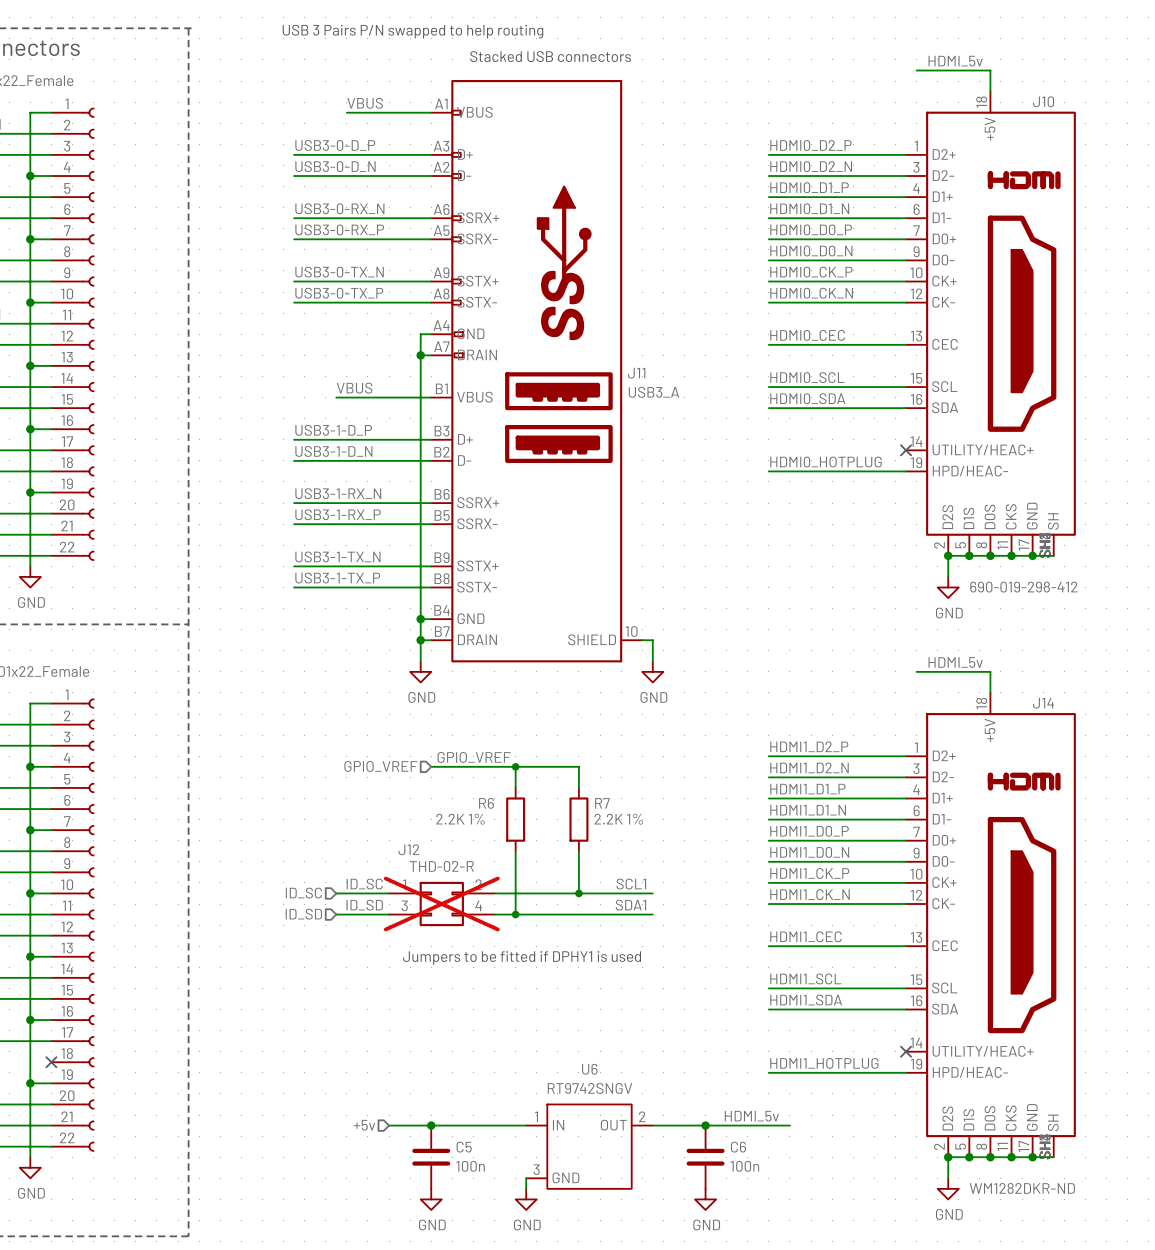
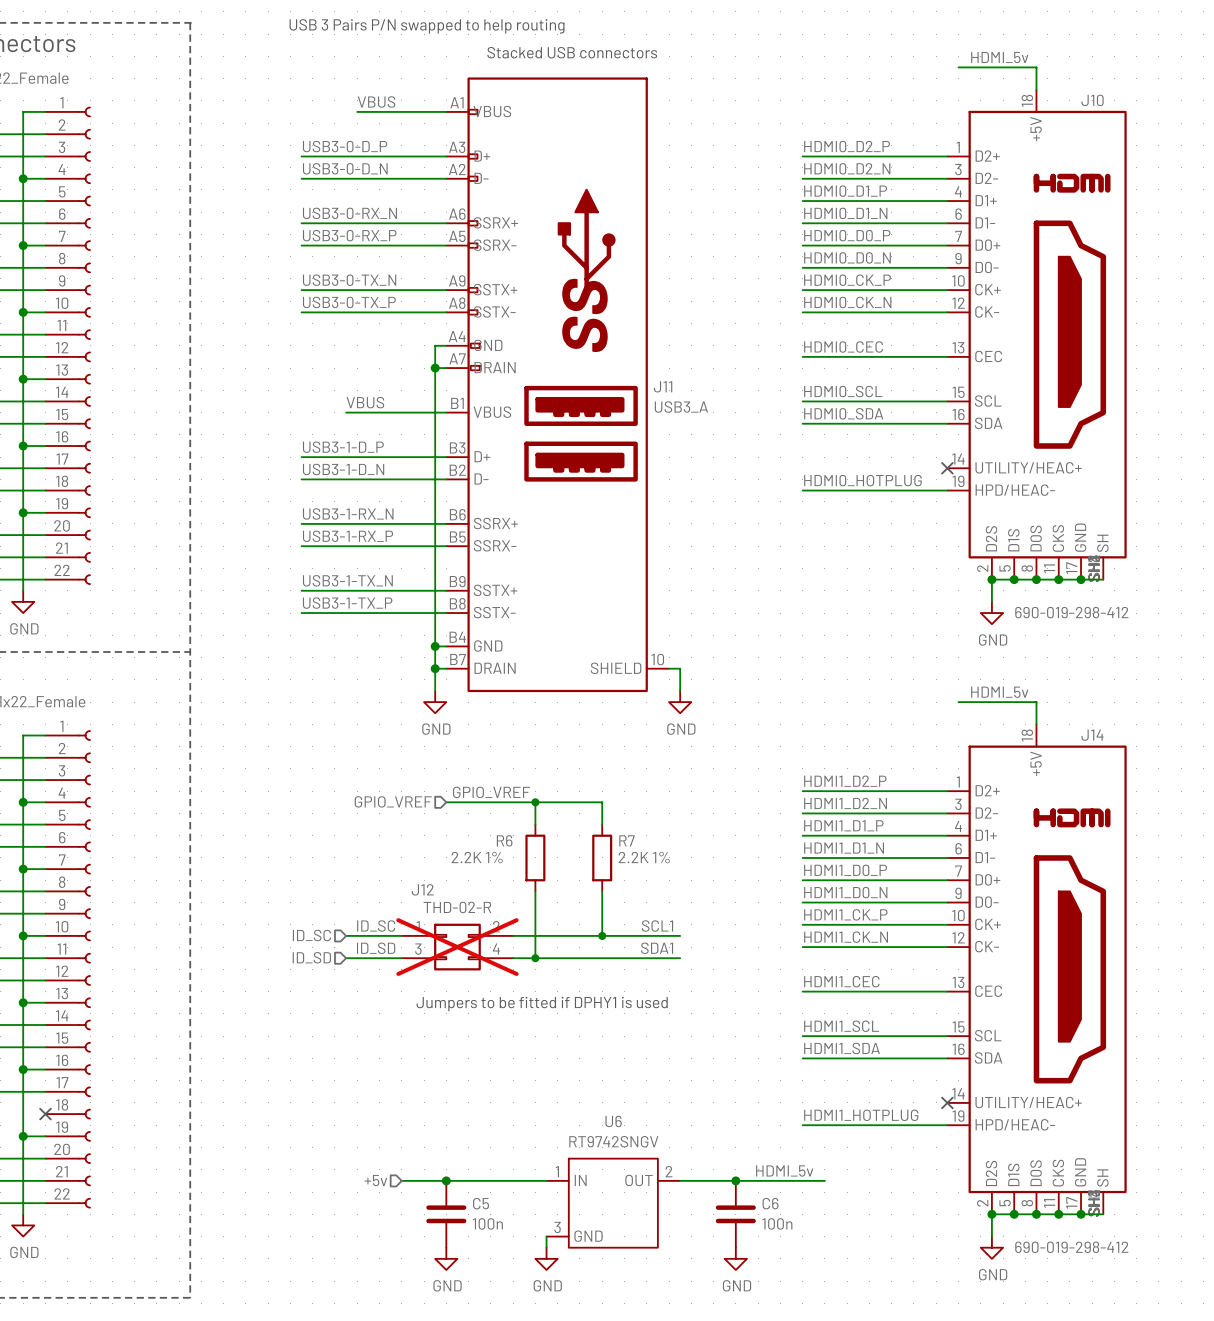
J14 value: WM1282DKR-ND (1022, 1188) -> 690-019-298-412 (1071, 1247)

